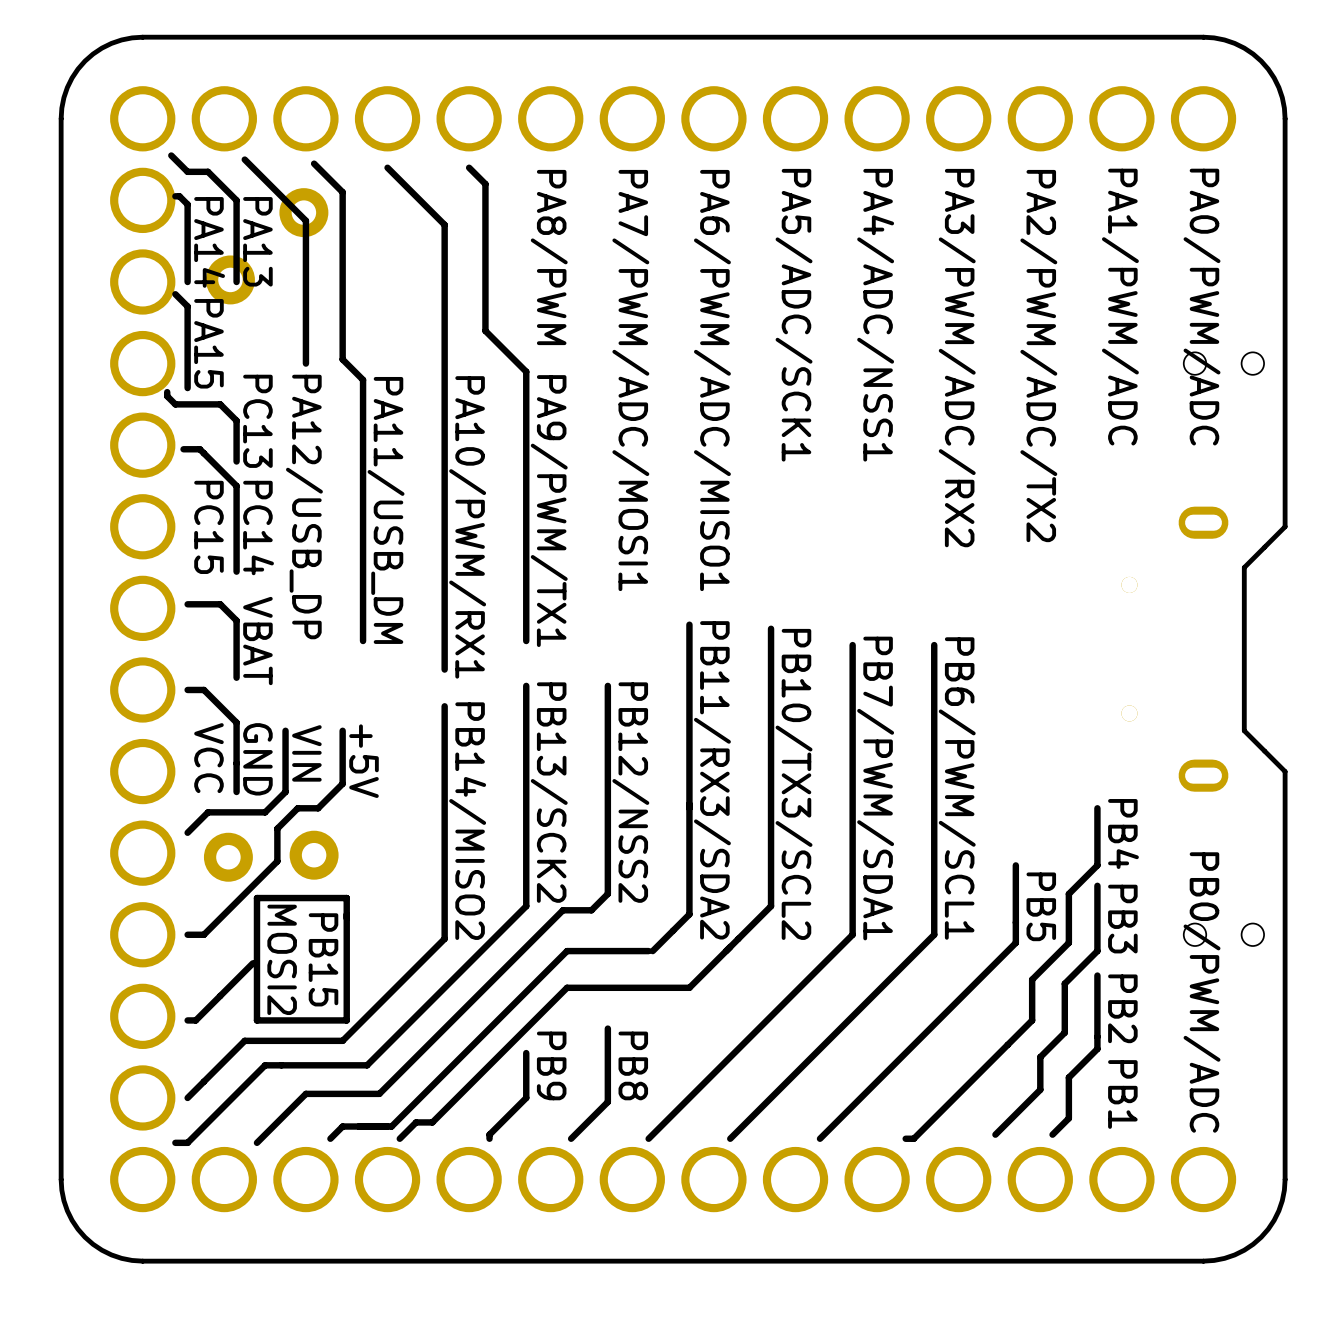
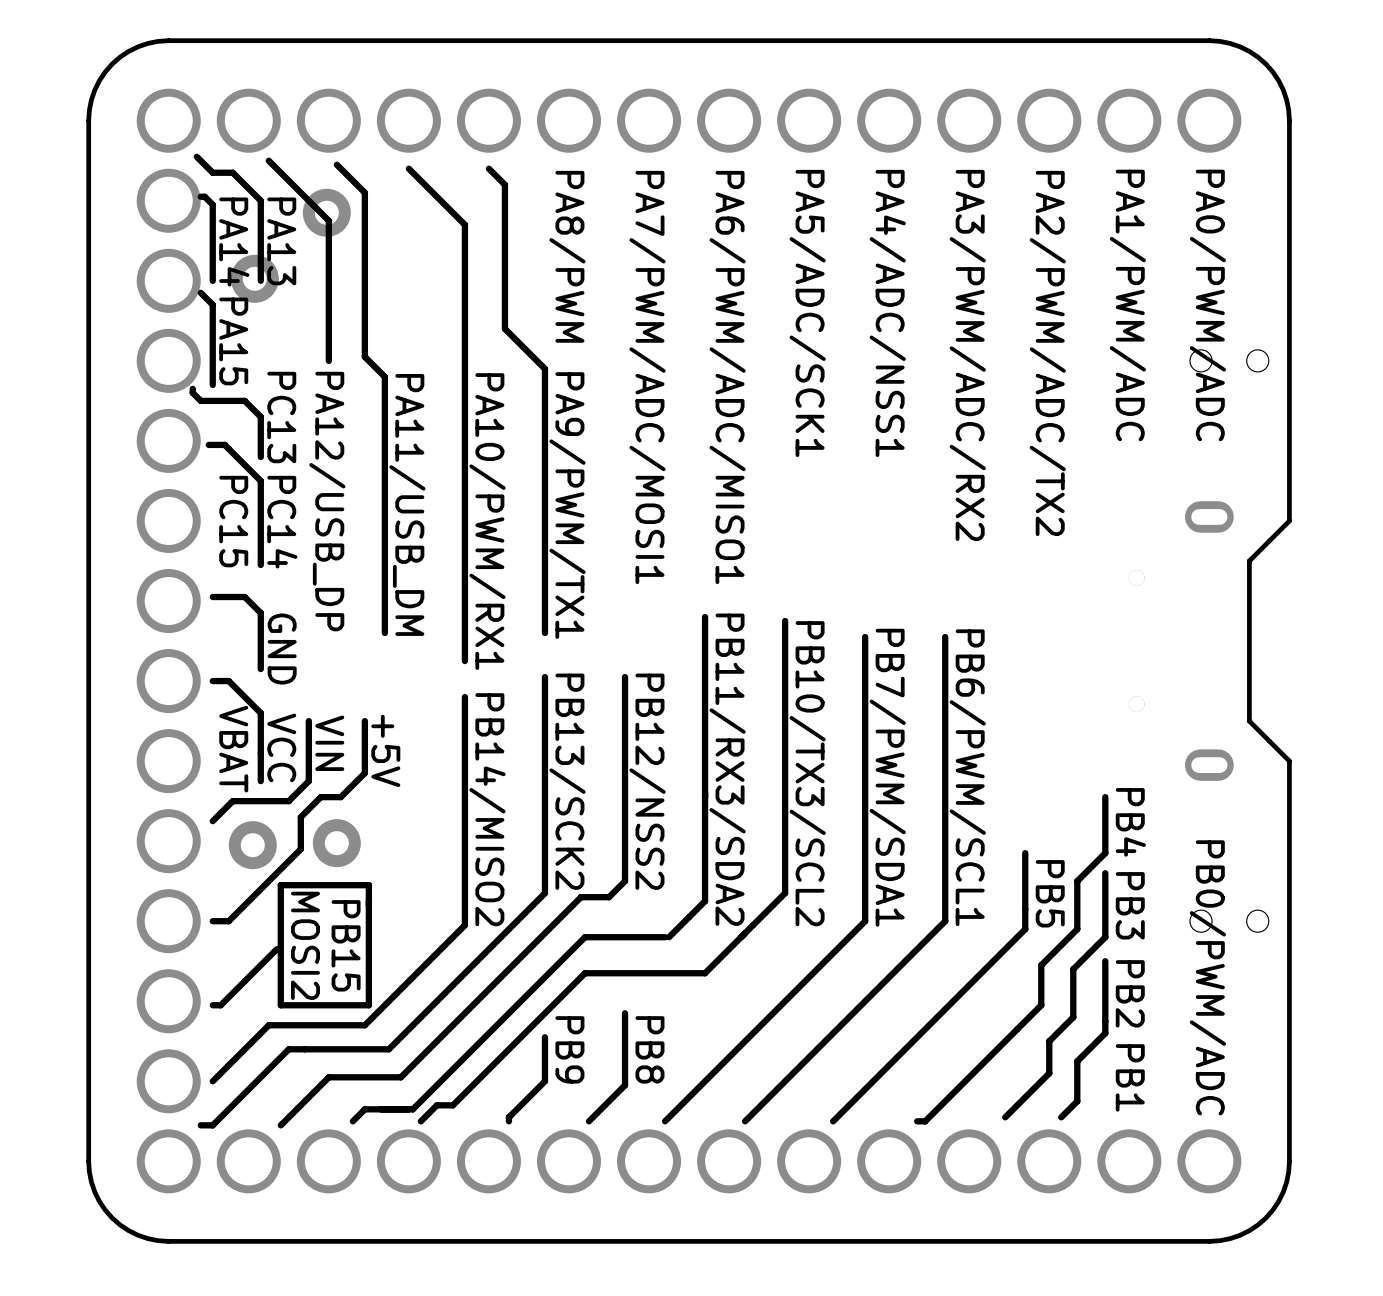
text: VBAT (257, 641) -> GND (282, 649)
text: VCC (208, 758) -> VBAT (233, 749)
text: GND (257, 759) -> VCC (281, 747)

